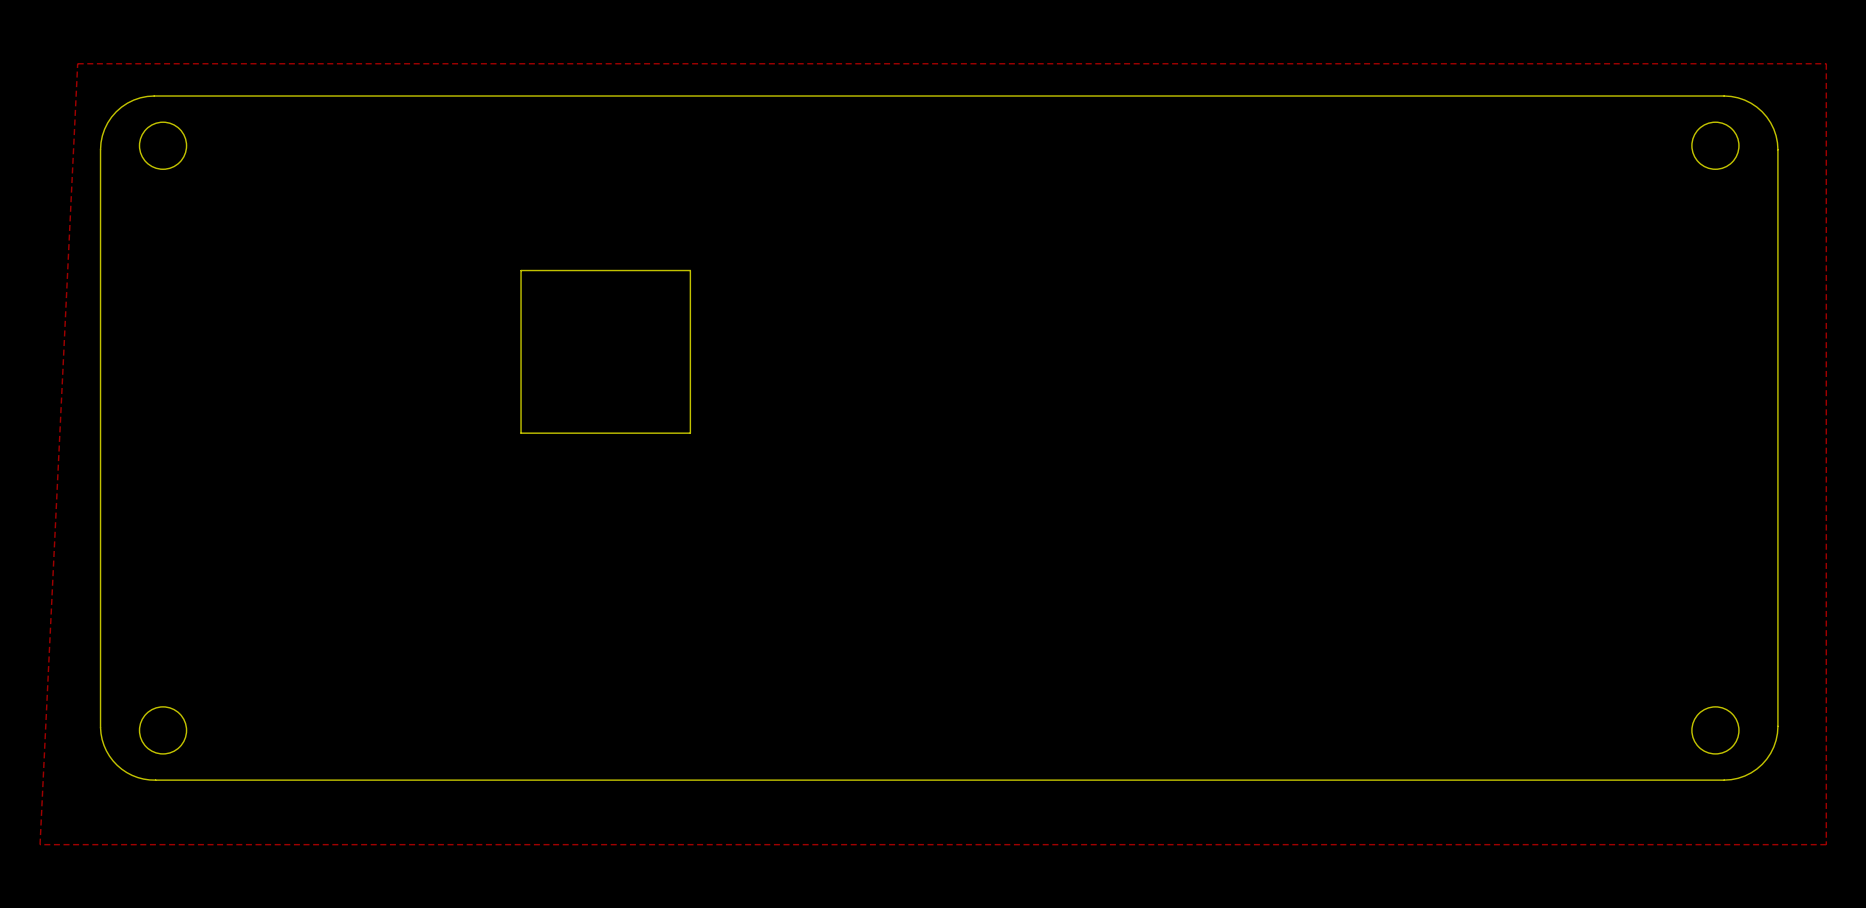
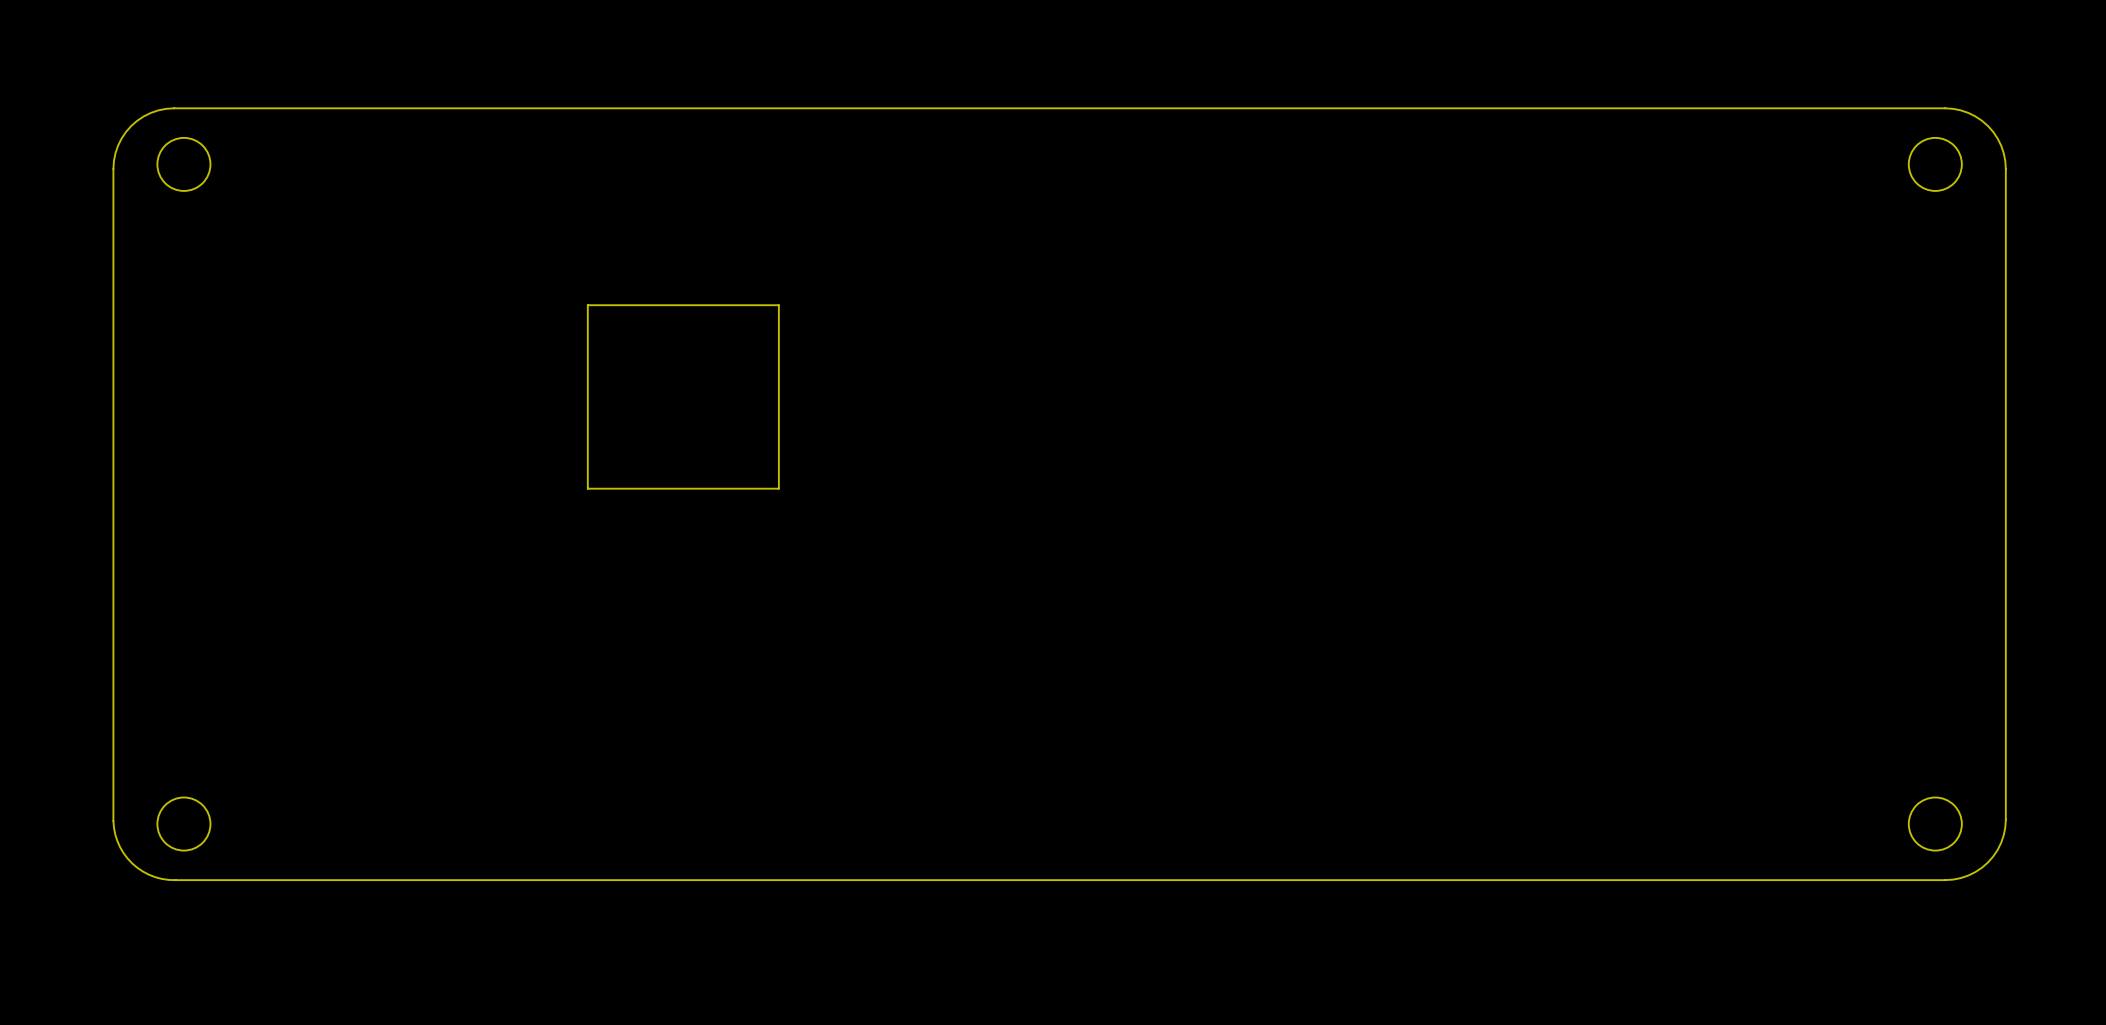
zone outline: (77, 63) (40, 844) (1826, 844) (1826, 63) (77, 63) -> none

